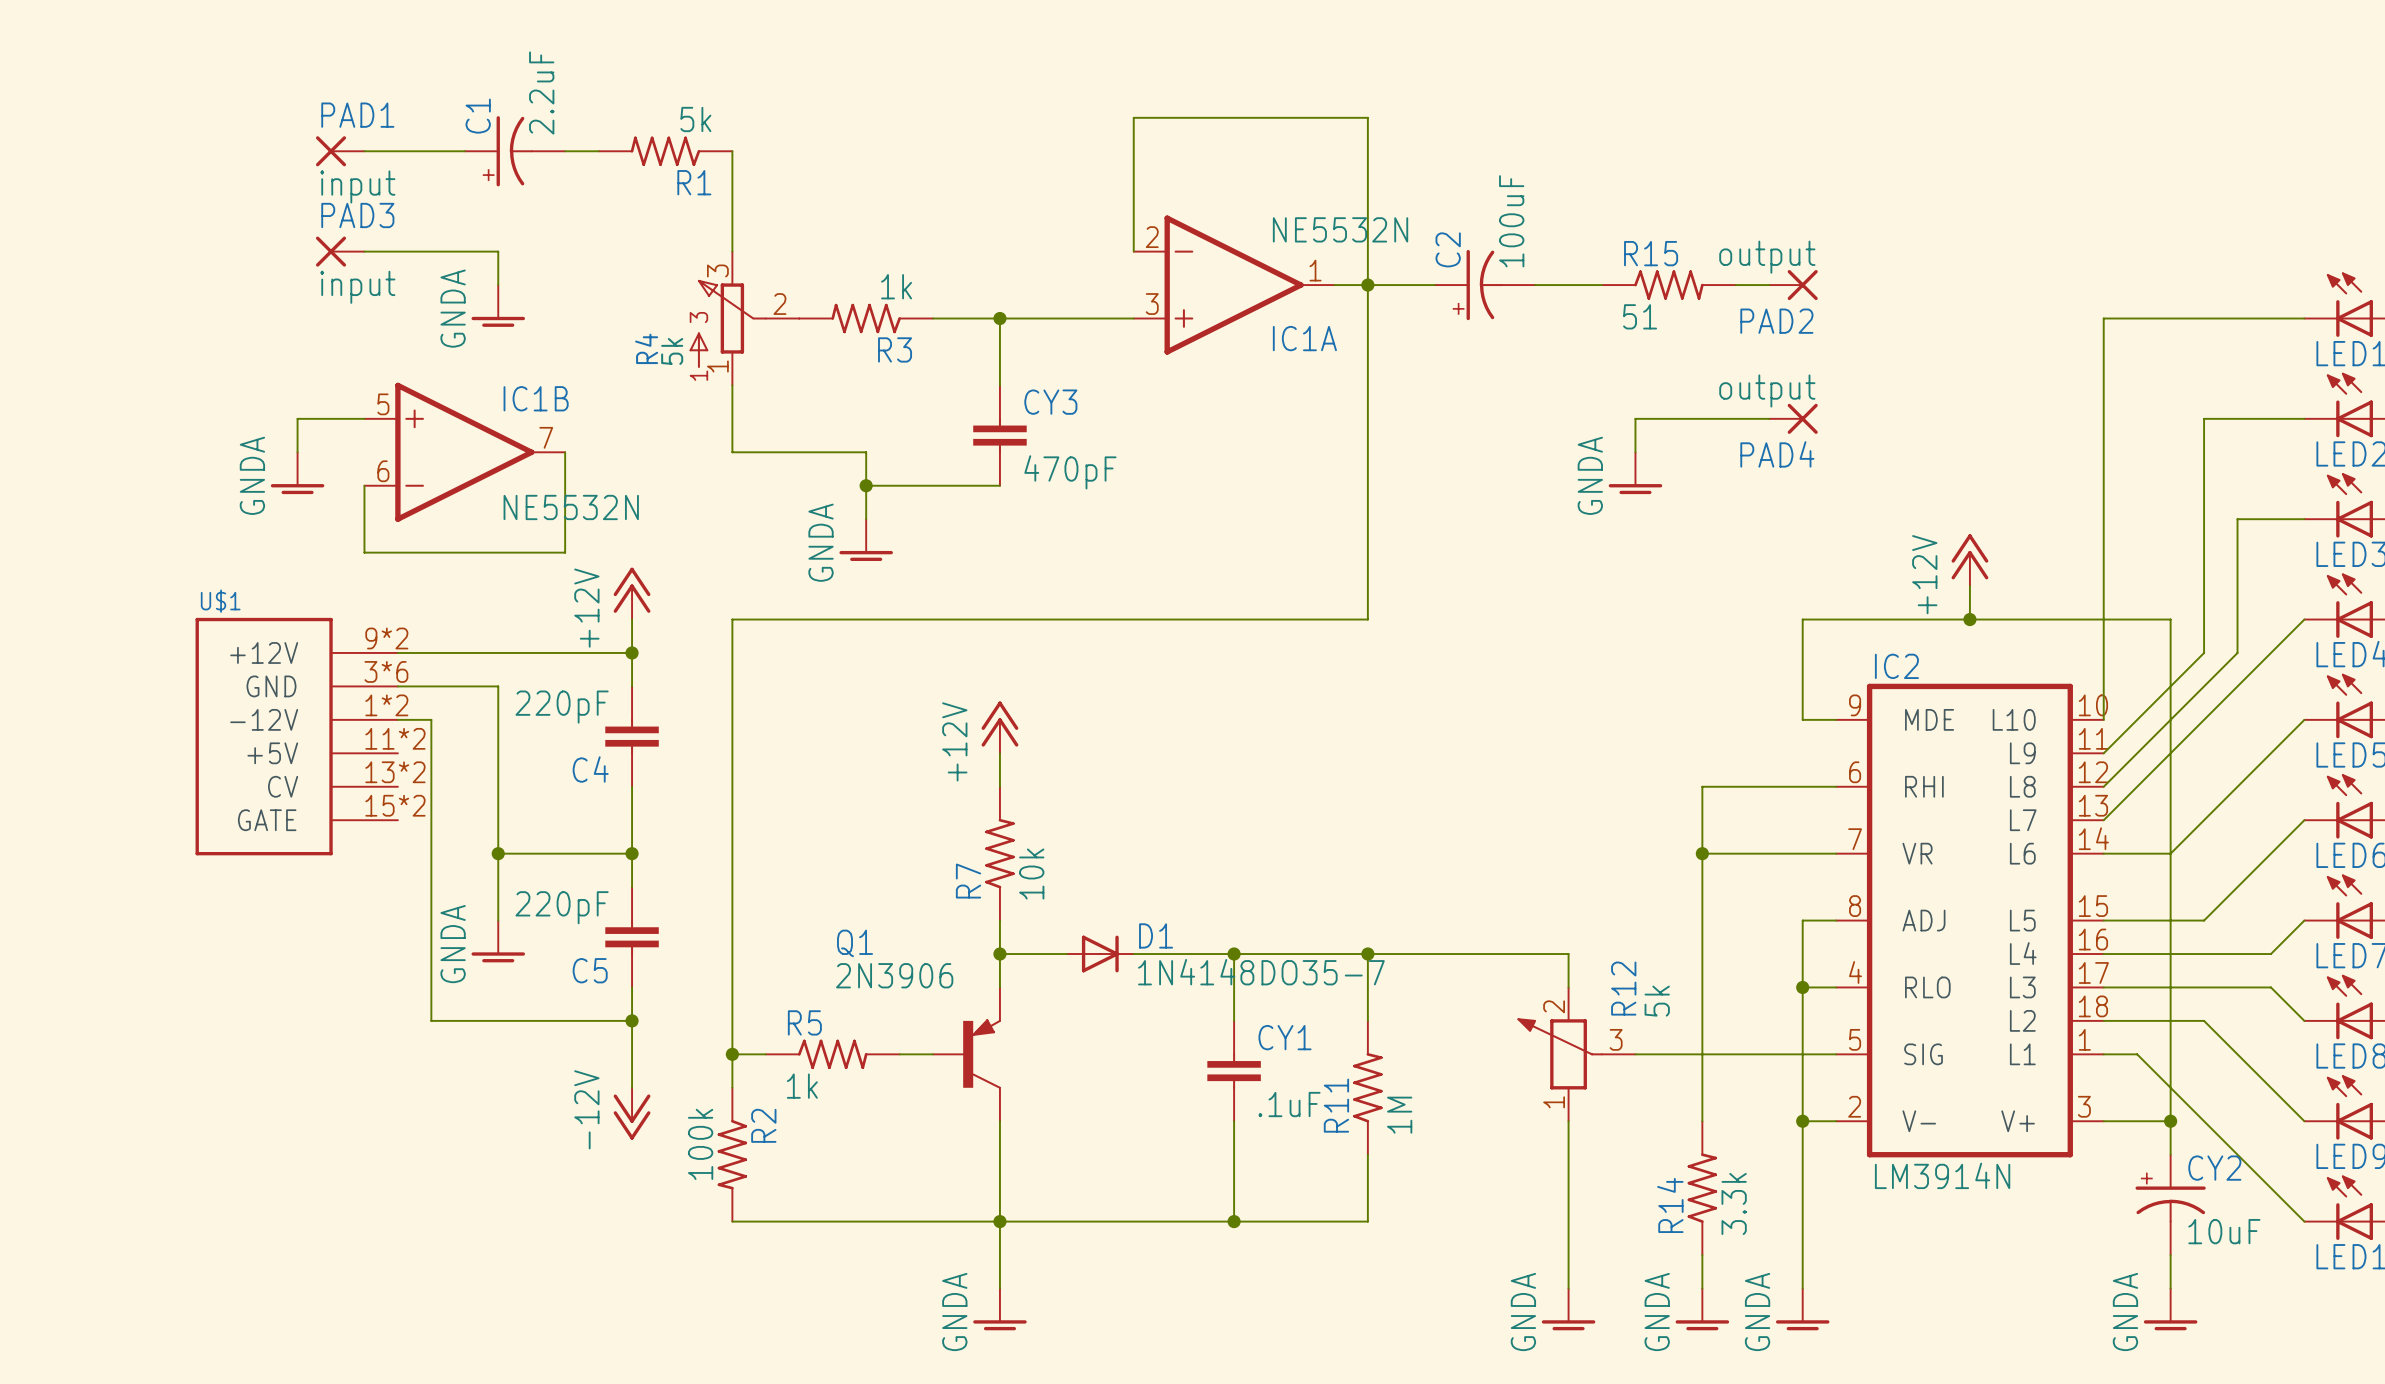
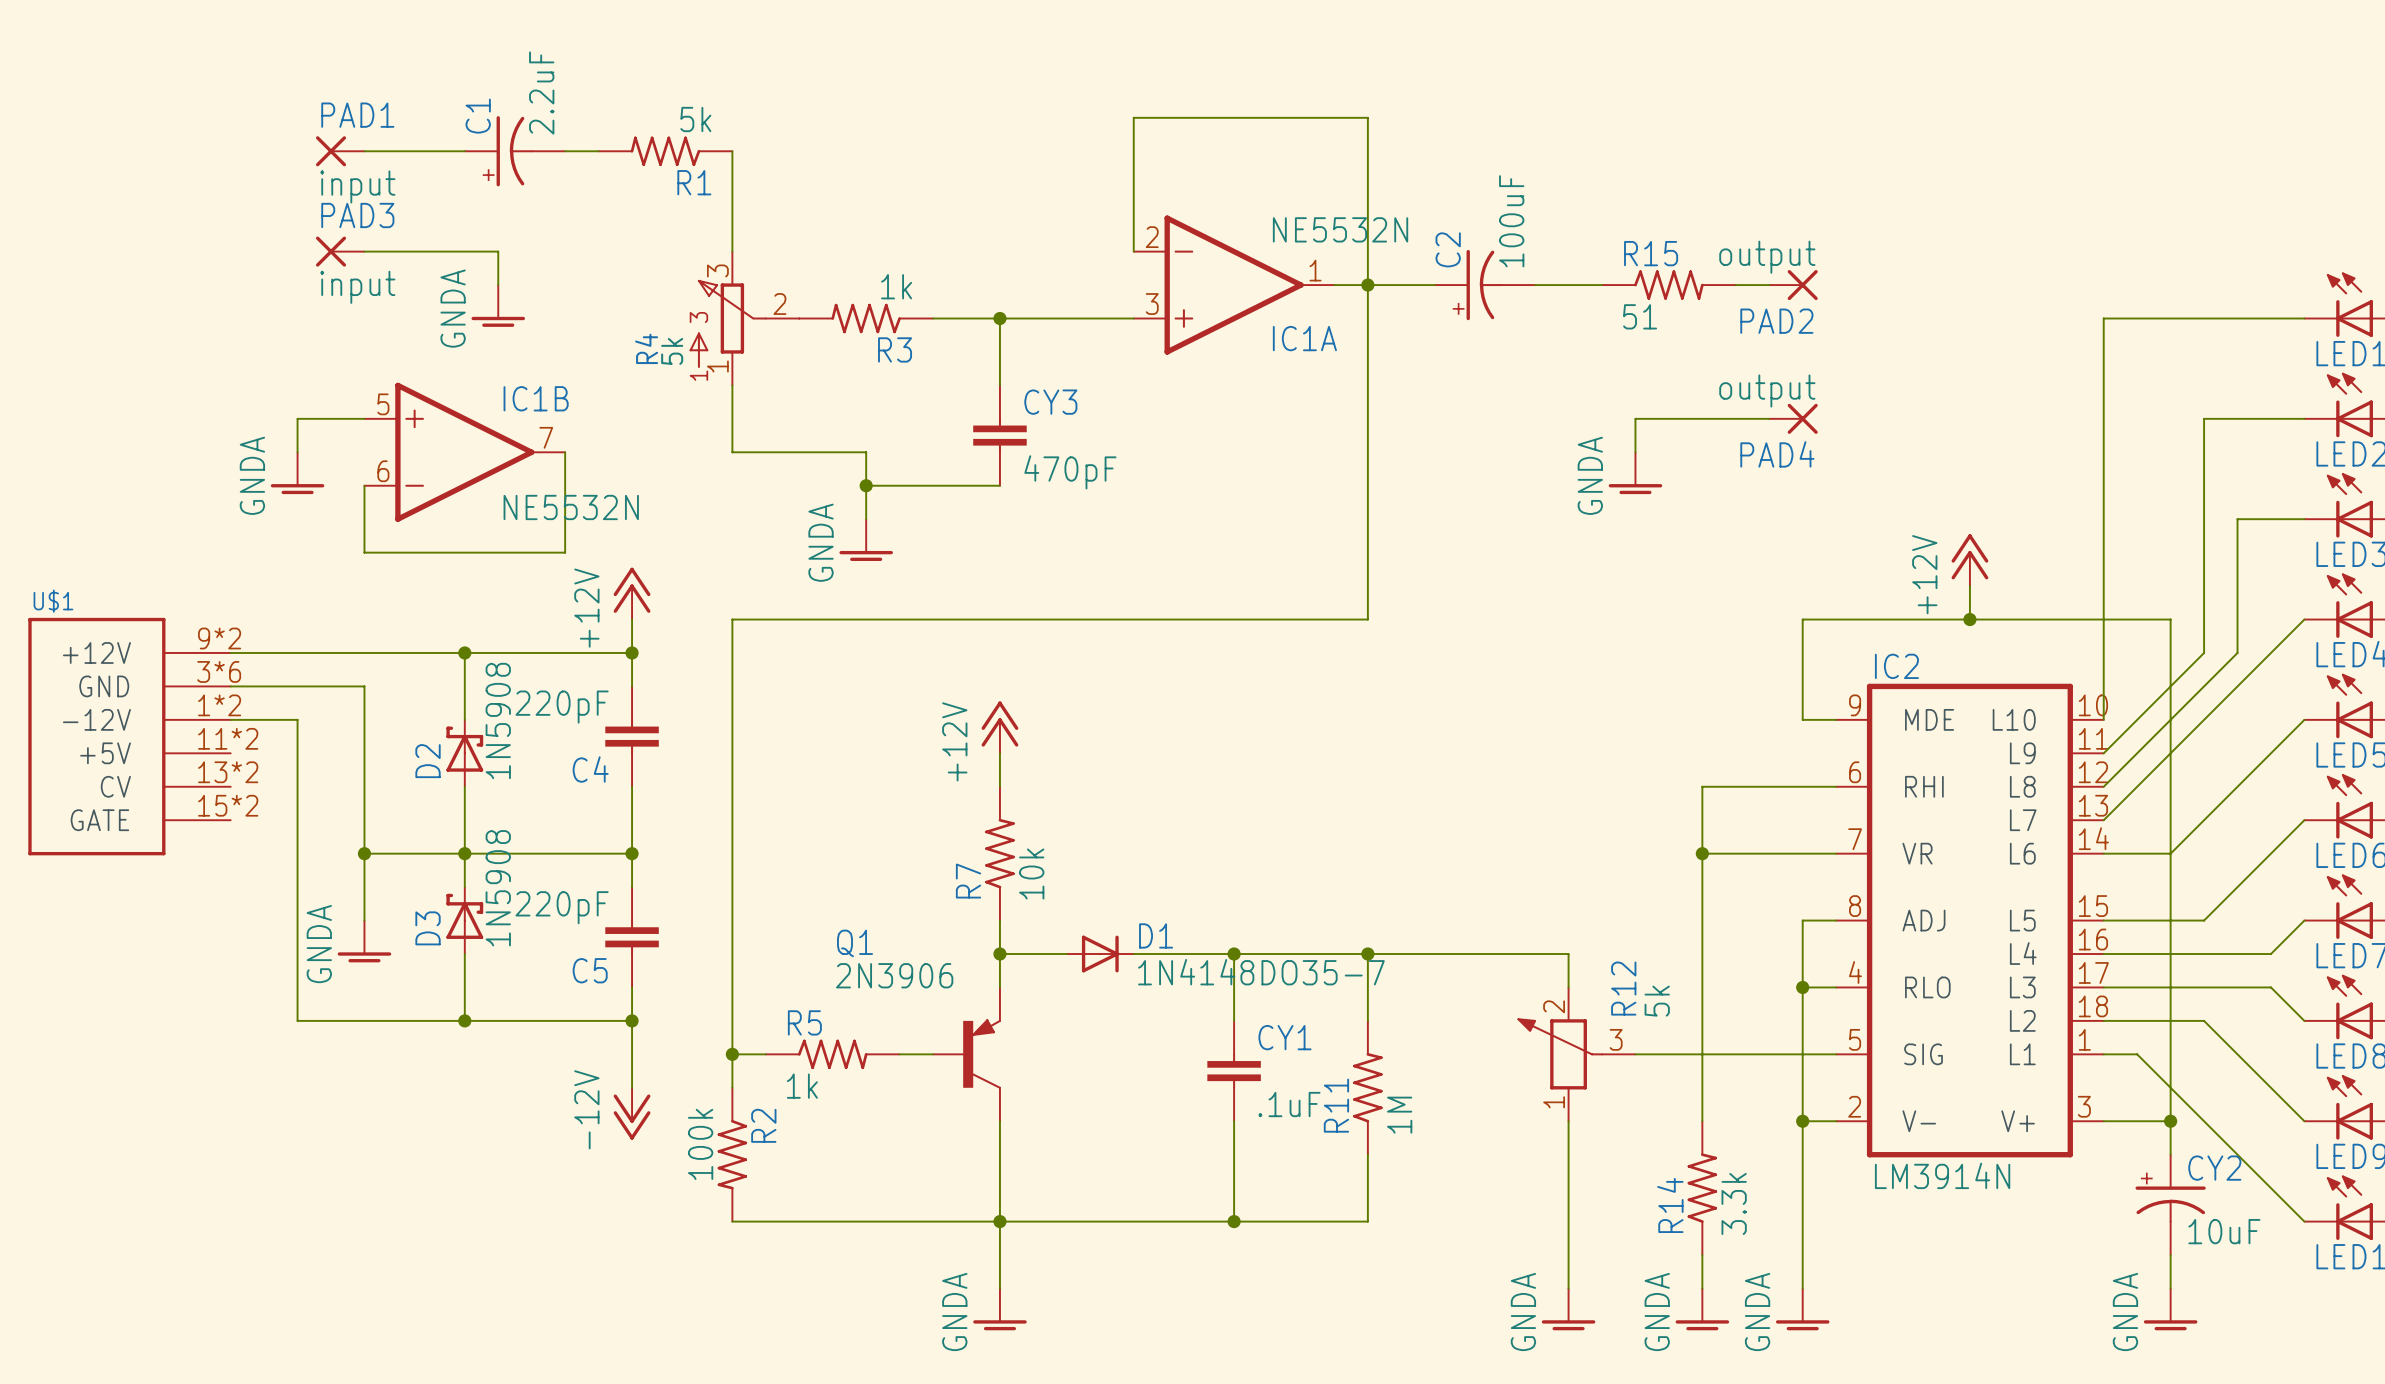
wire: none -> (230, 652) (397, 652)
wire: none -> (464, 652) (464, 719)
junction: none -> (464, 652)
wire: none -> (230, 686) (364, 686) (364, 920)
wire: (397, 686) (498, 686) (498, 920) -> none
wire: (397, 719) (431, 719) (431, 1020) -> (230, 719) (297, 719) (297, 1020) (431, 1020)
U$1 position: (296, 736) -> (129, 736)
D2: none -> 1N5908 (464, 753)
wire: none -> (464, 786) (464, 887)
wire: none -> (364, 853) (498, 853)
junction: none -> (364, 853)
junction position: (498, 853) -> (464, 853)
D3: none -> 1N5908 (464, 920)
power symbol position: GNDA (498, 941) -> GNDA (364, 941)
wire: none -> (464, 954) (464, 1020)
junction: none -> (464, 1020)

